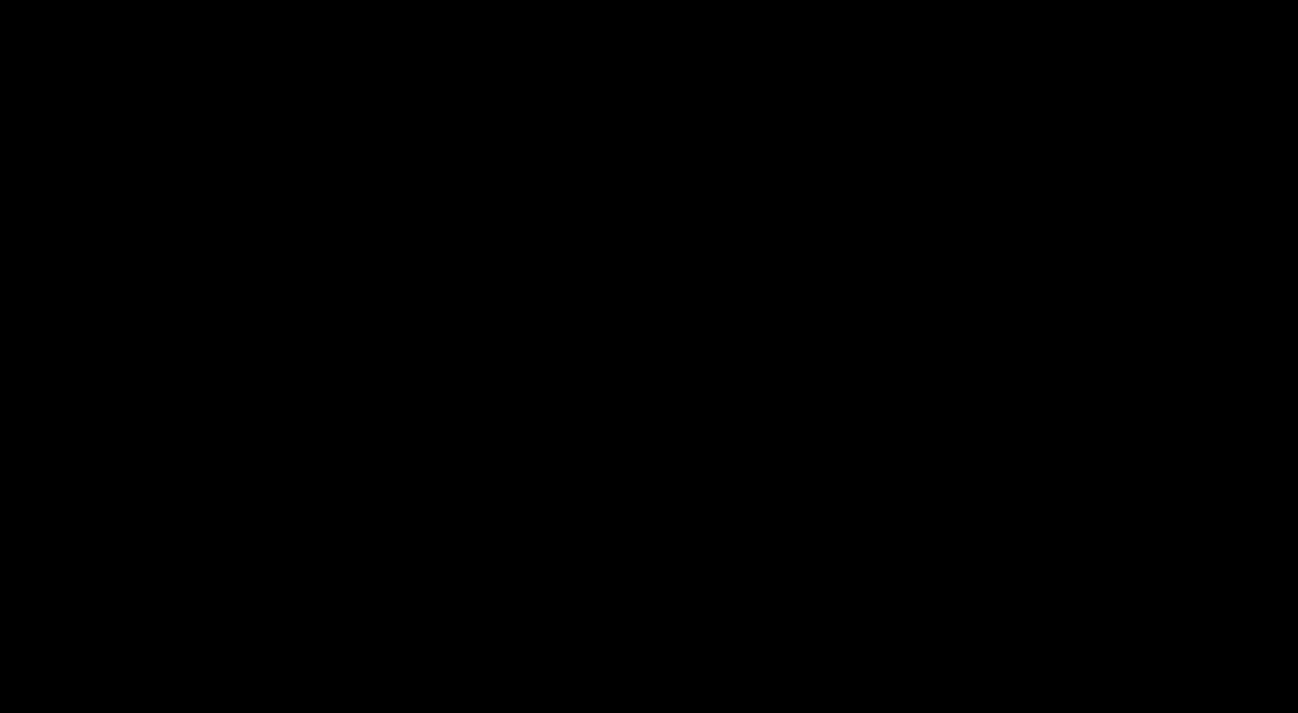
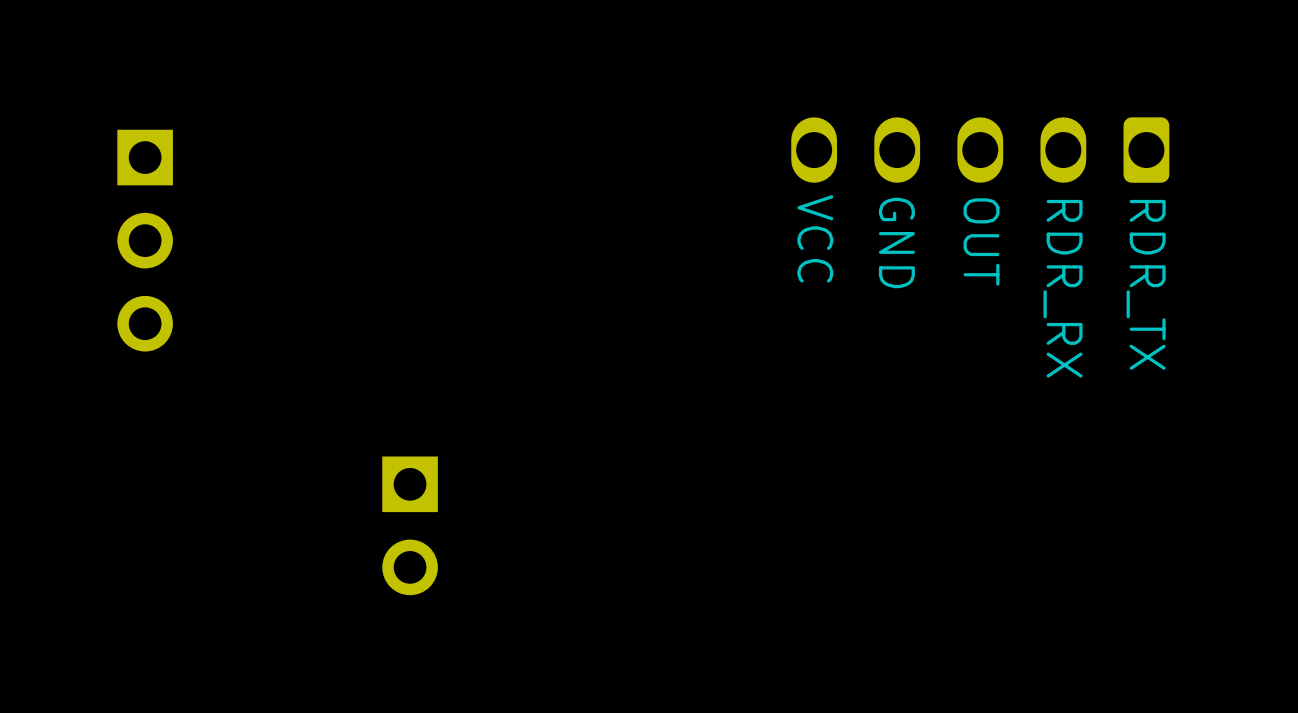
part: none -> (980, 150)
part: none -> (145, 240)
part: none -> (410, 525)

